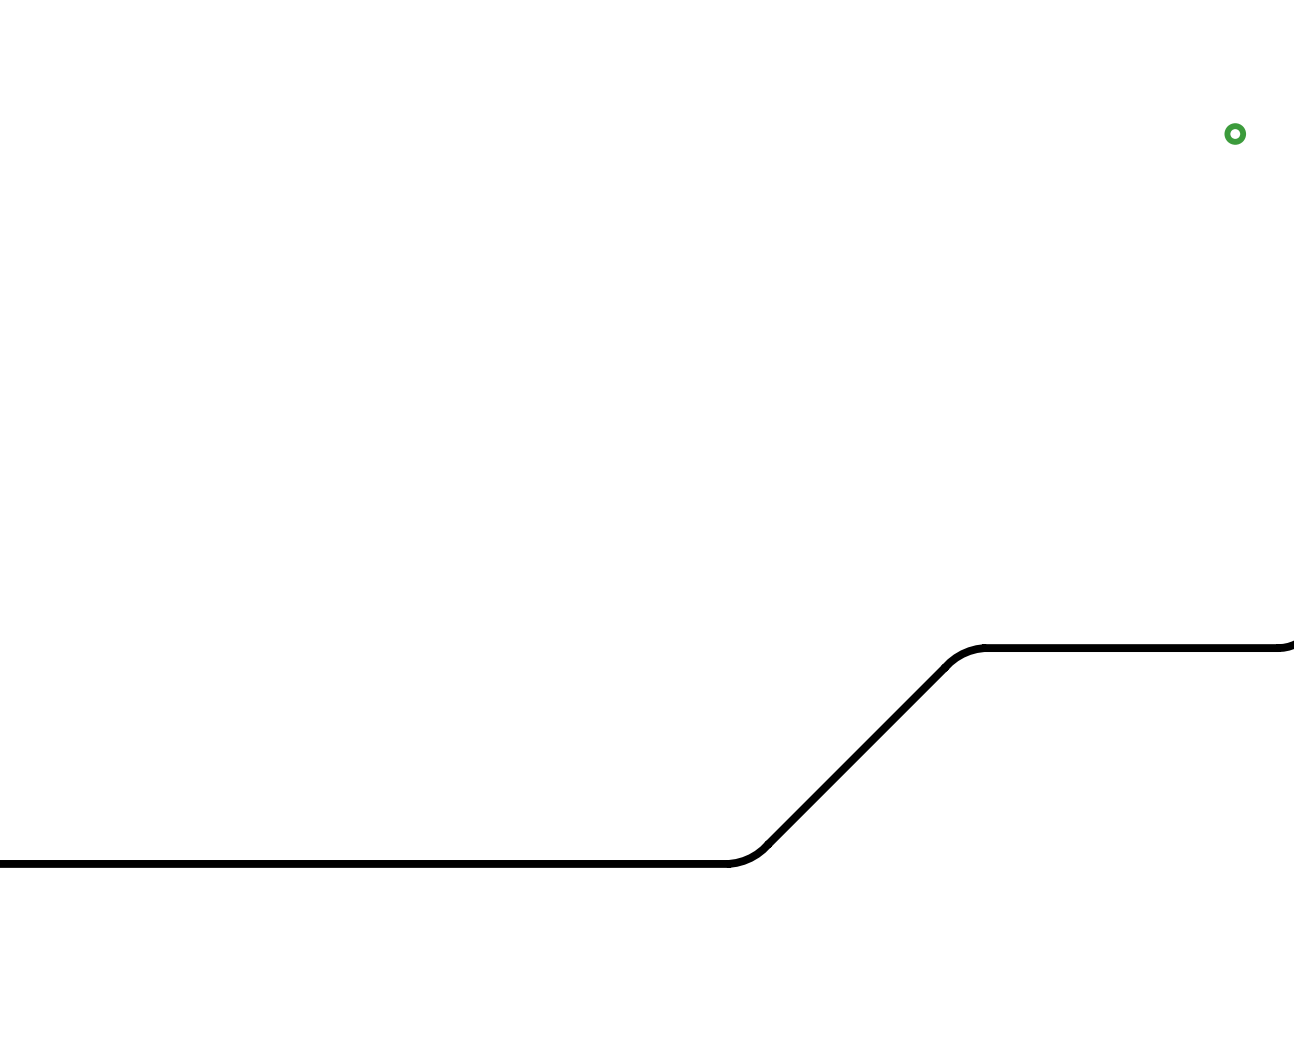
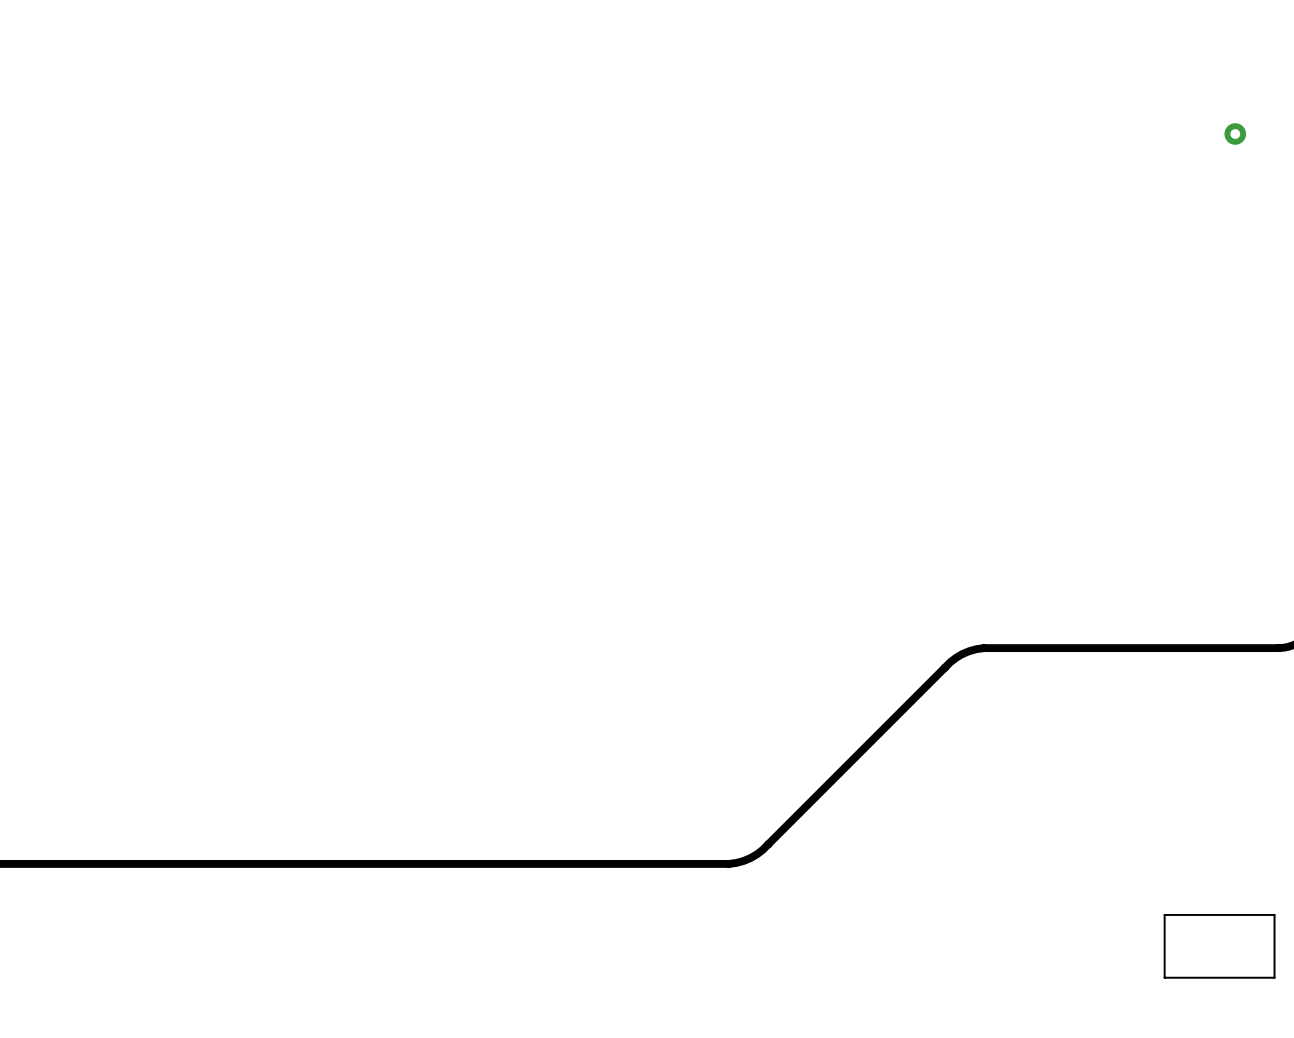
part: none -> (1219, 946)

